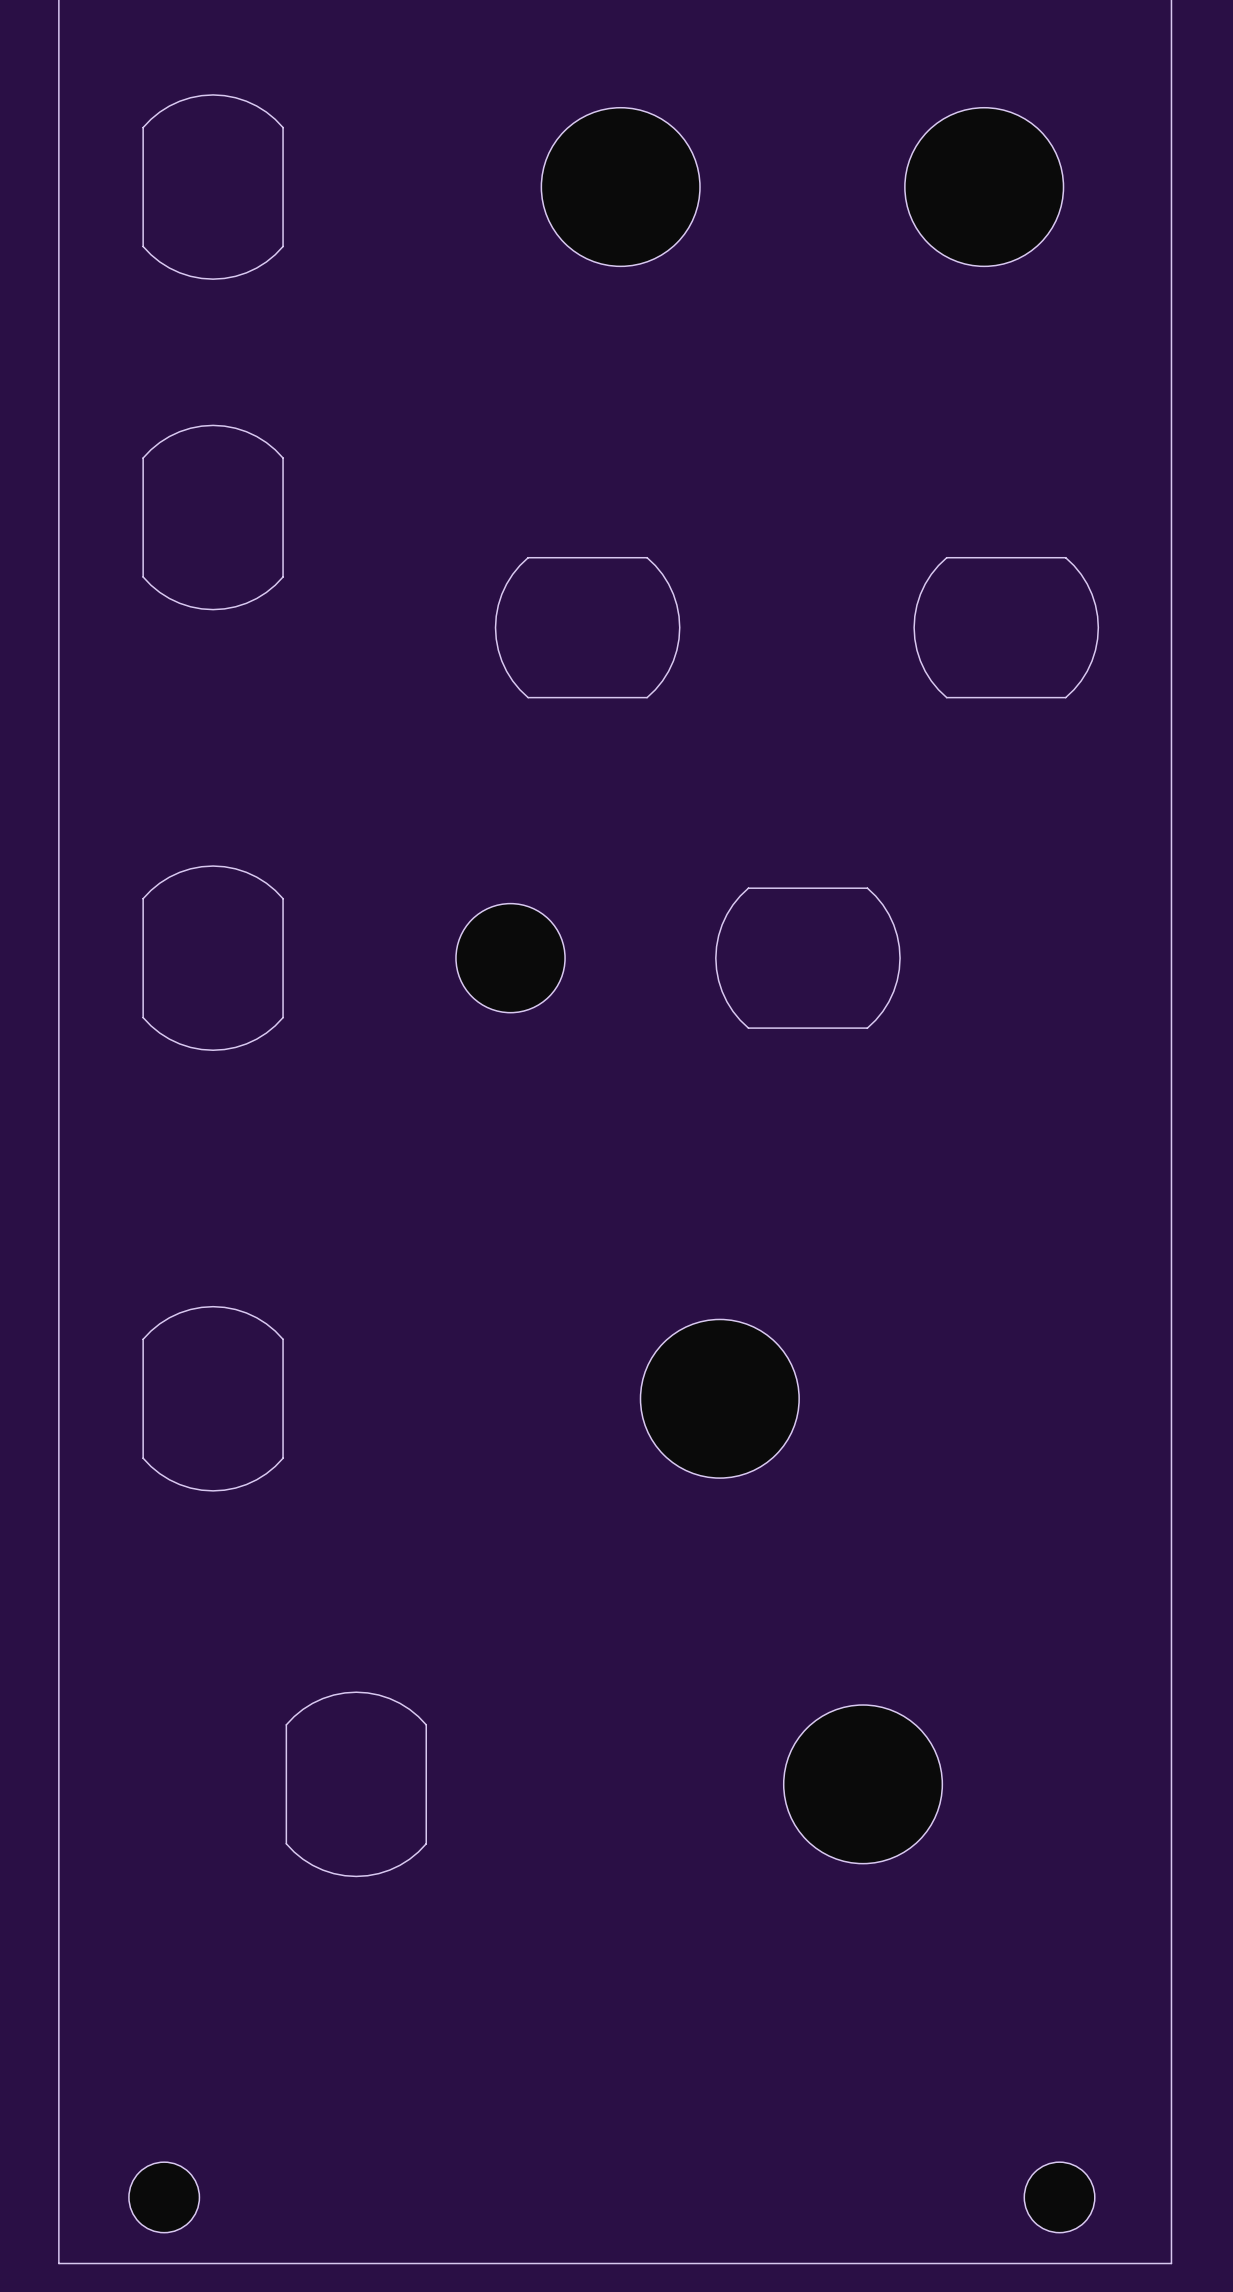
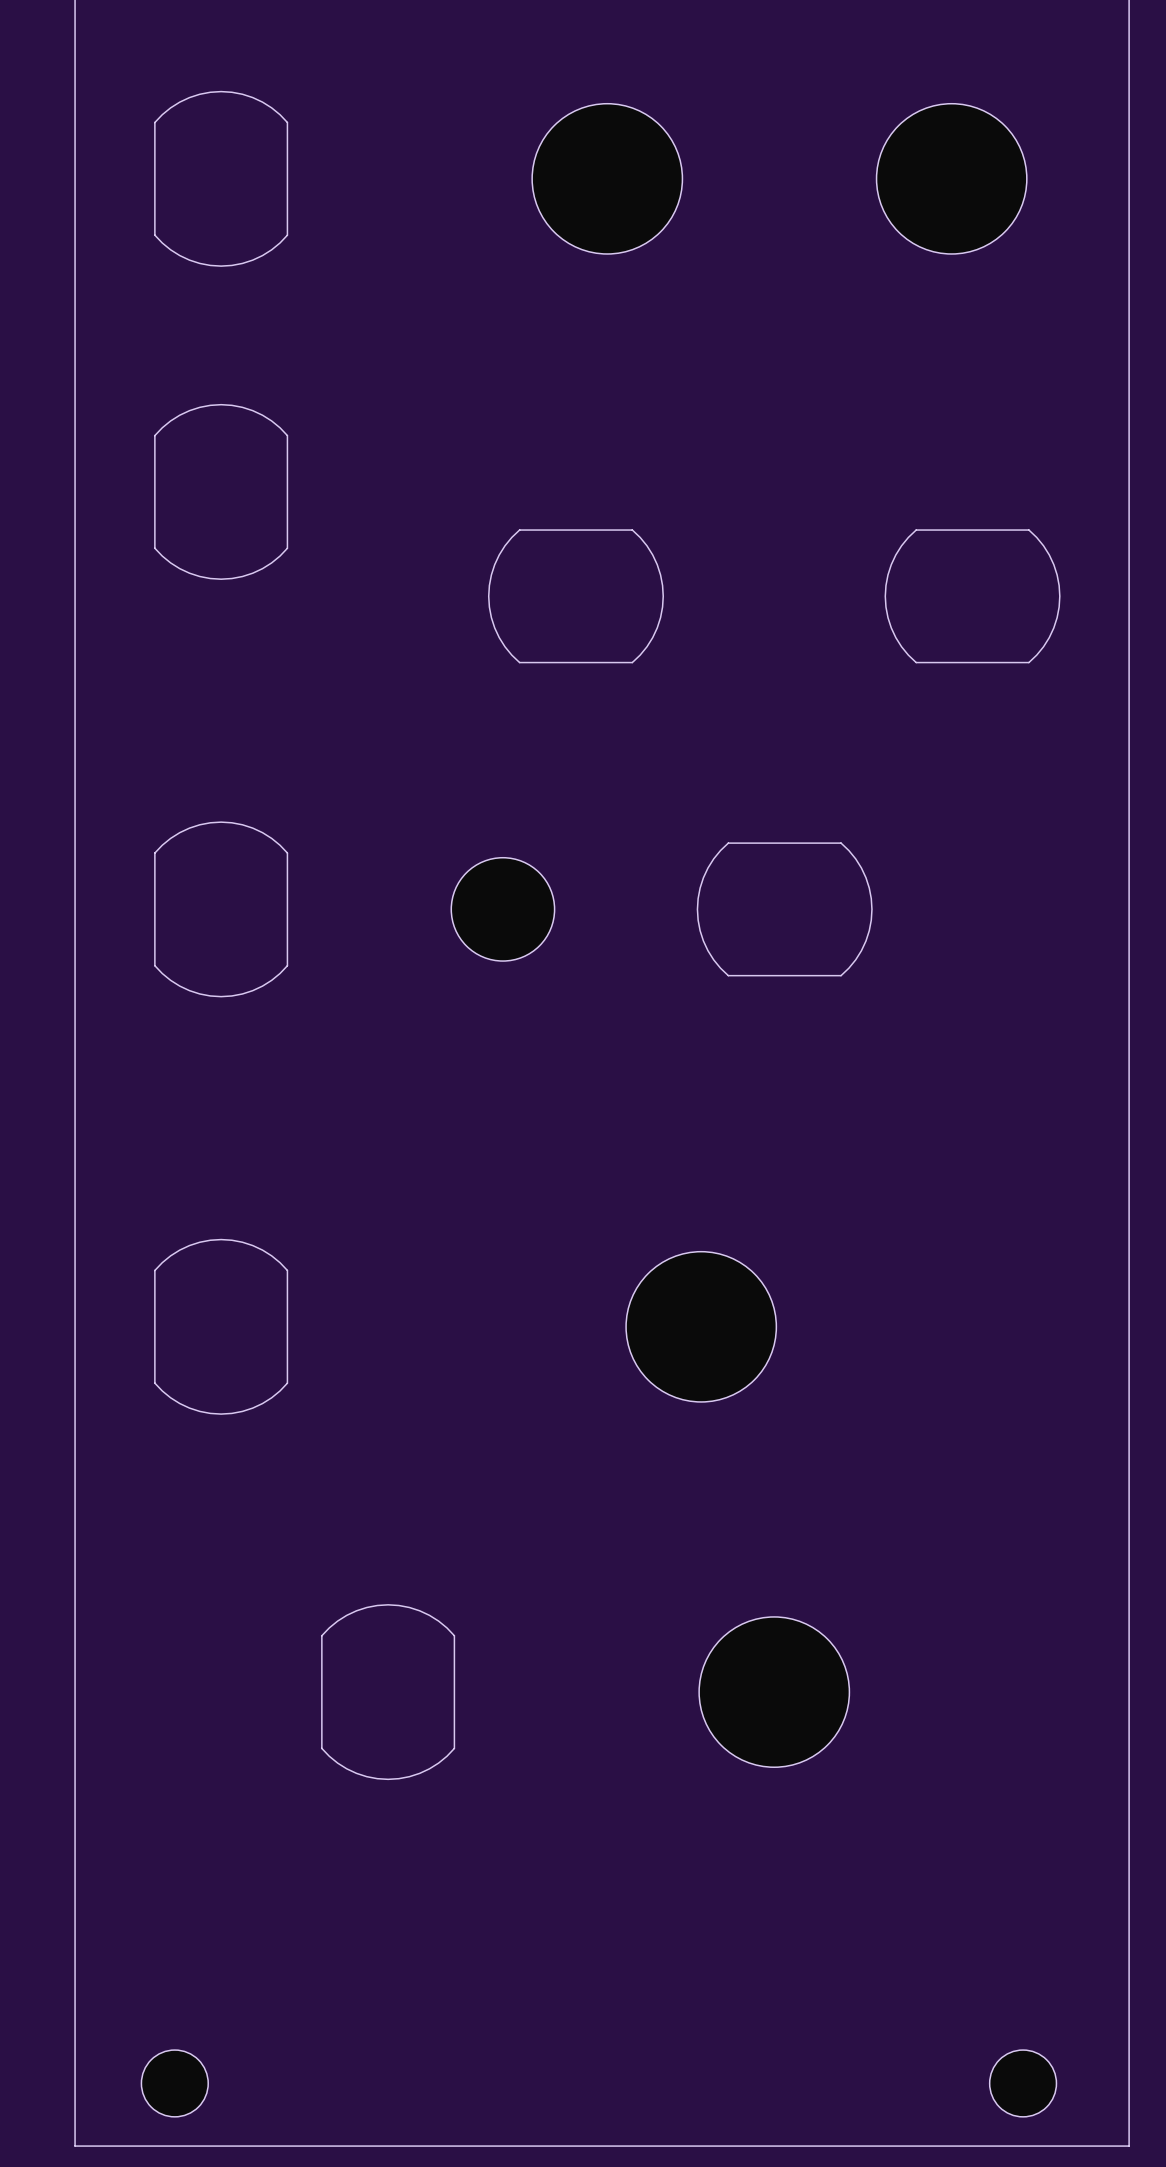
drawing position: (356, 1784) -> (388, 1692)
part position: (863, 1784) -> (774, 1692)

